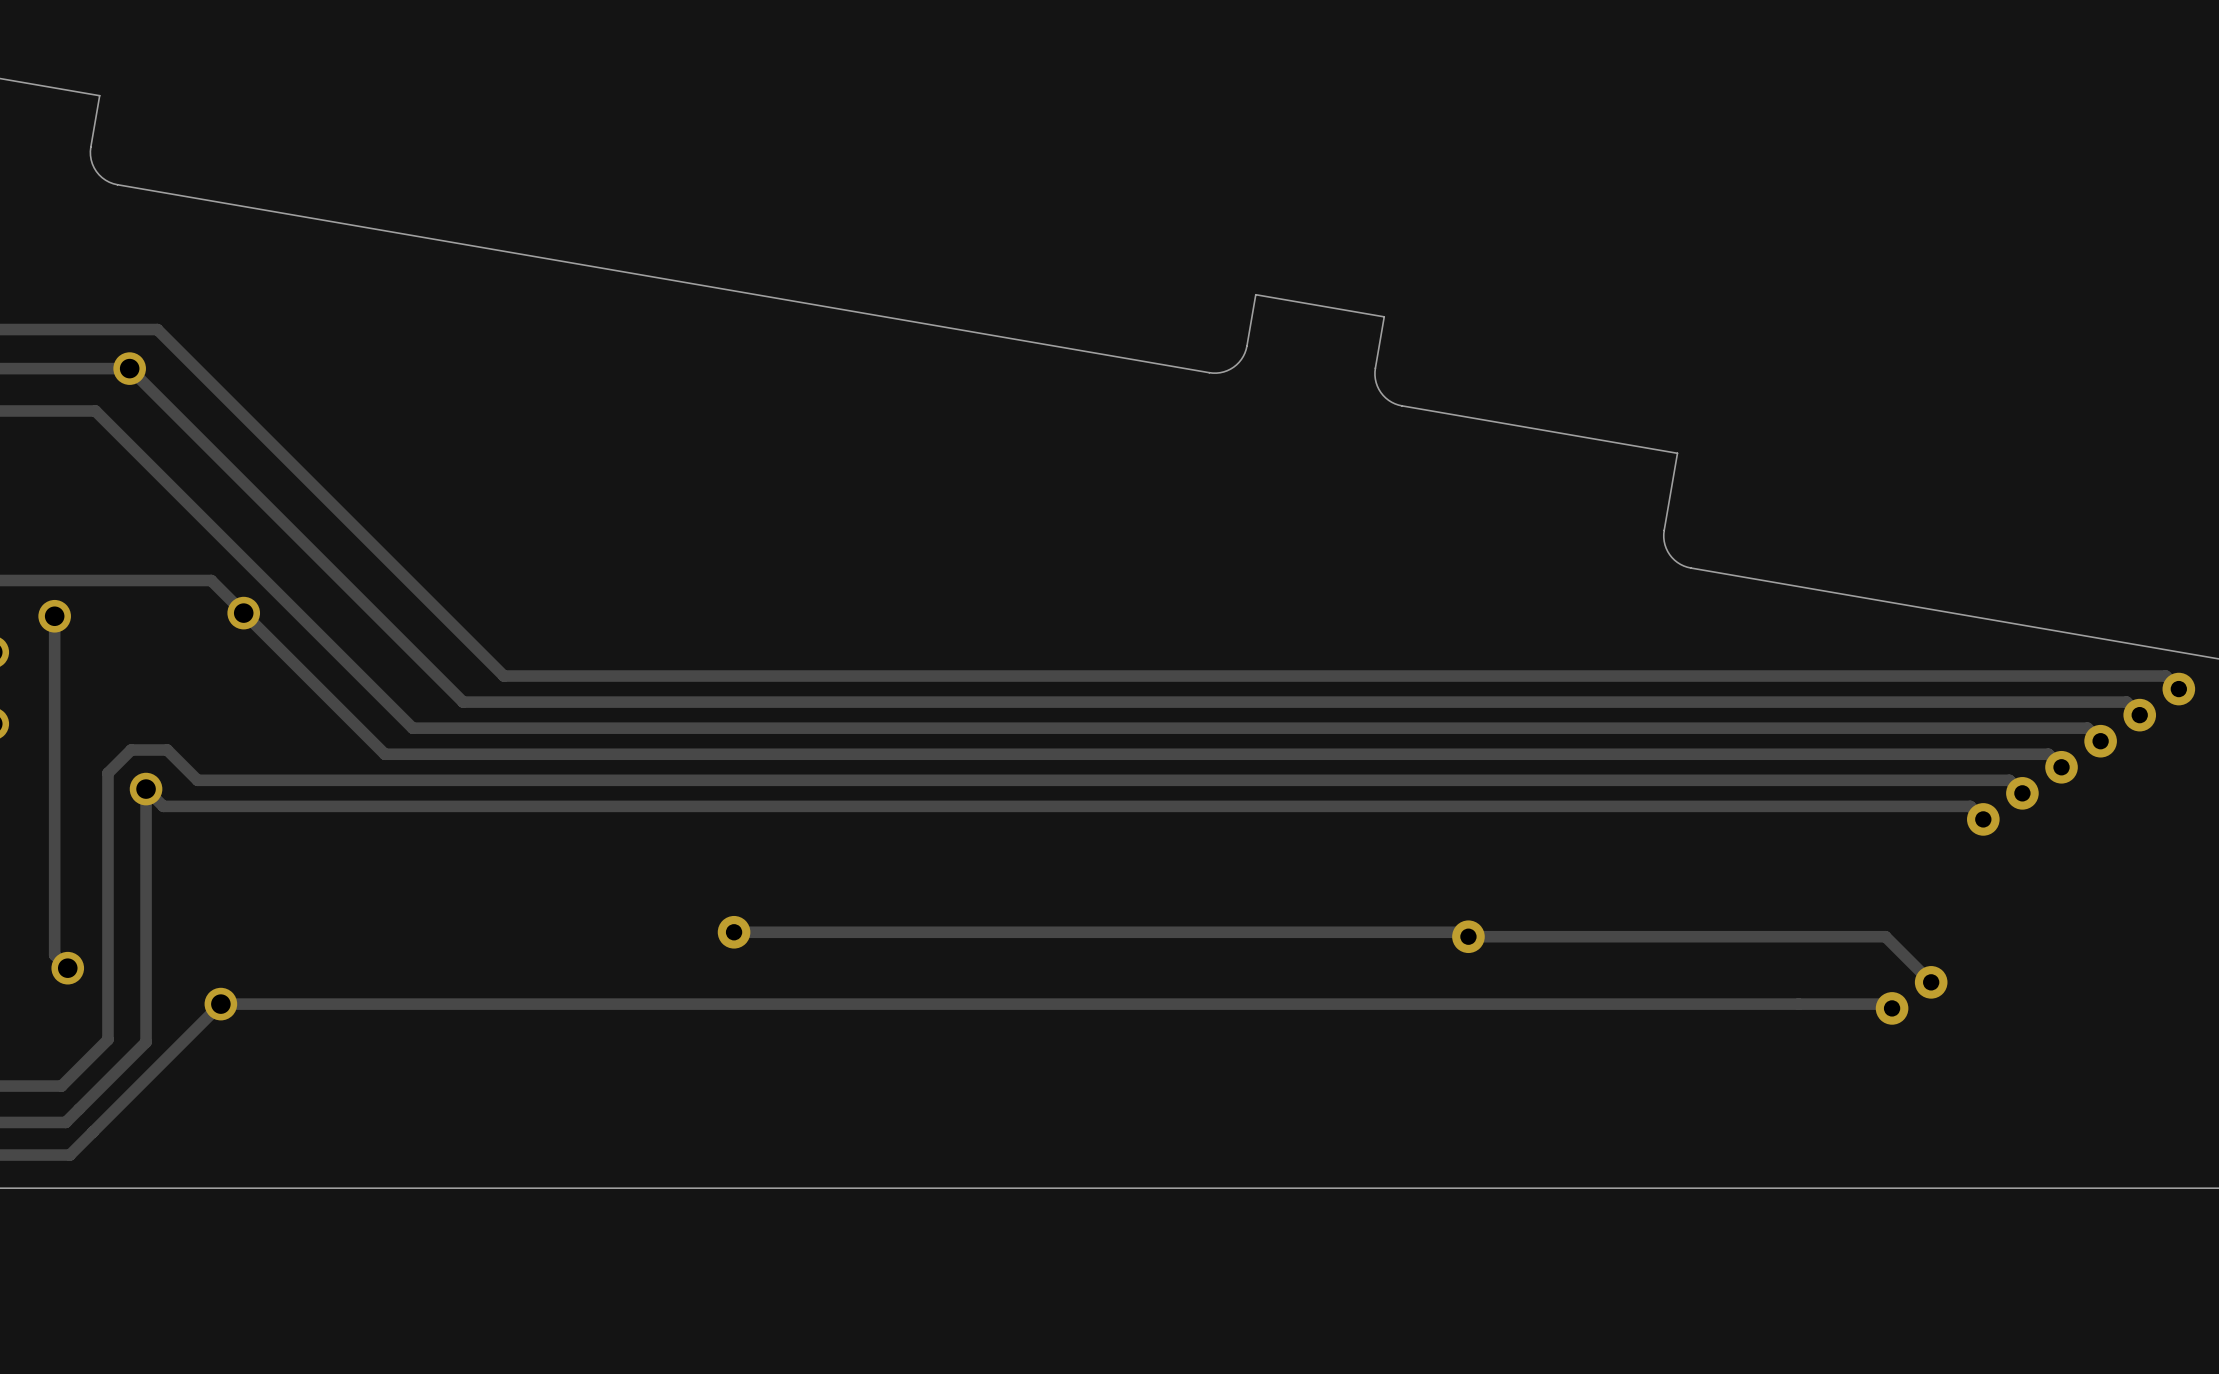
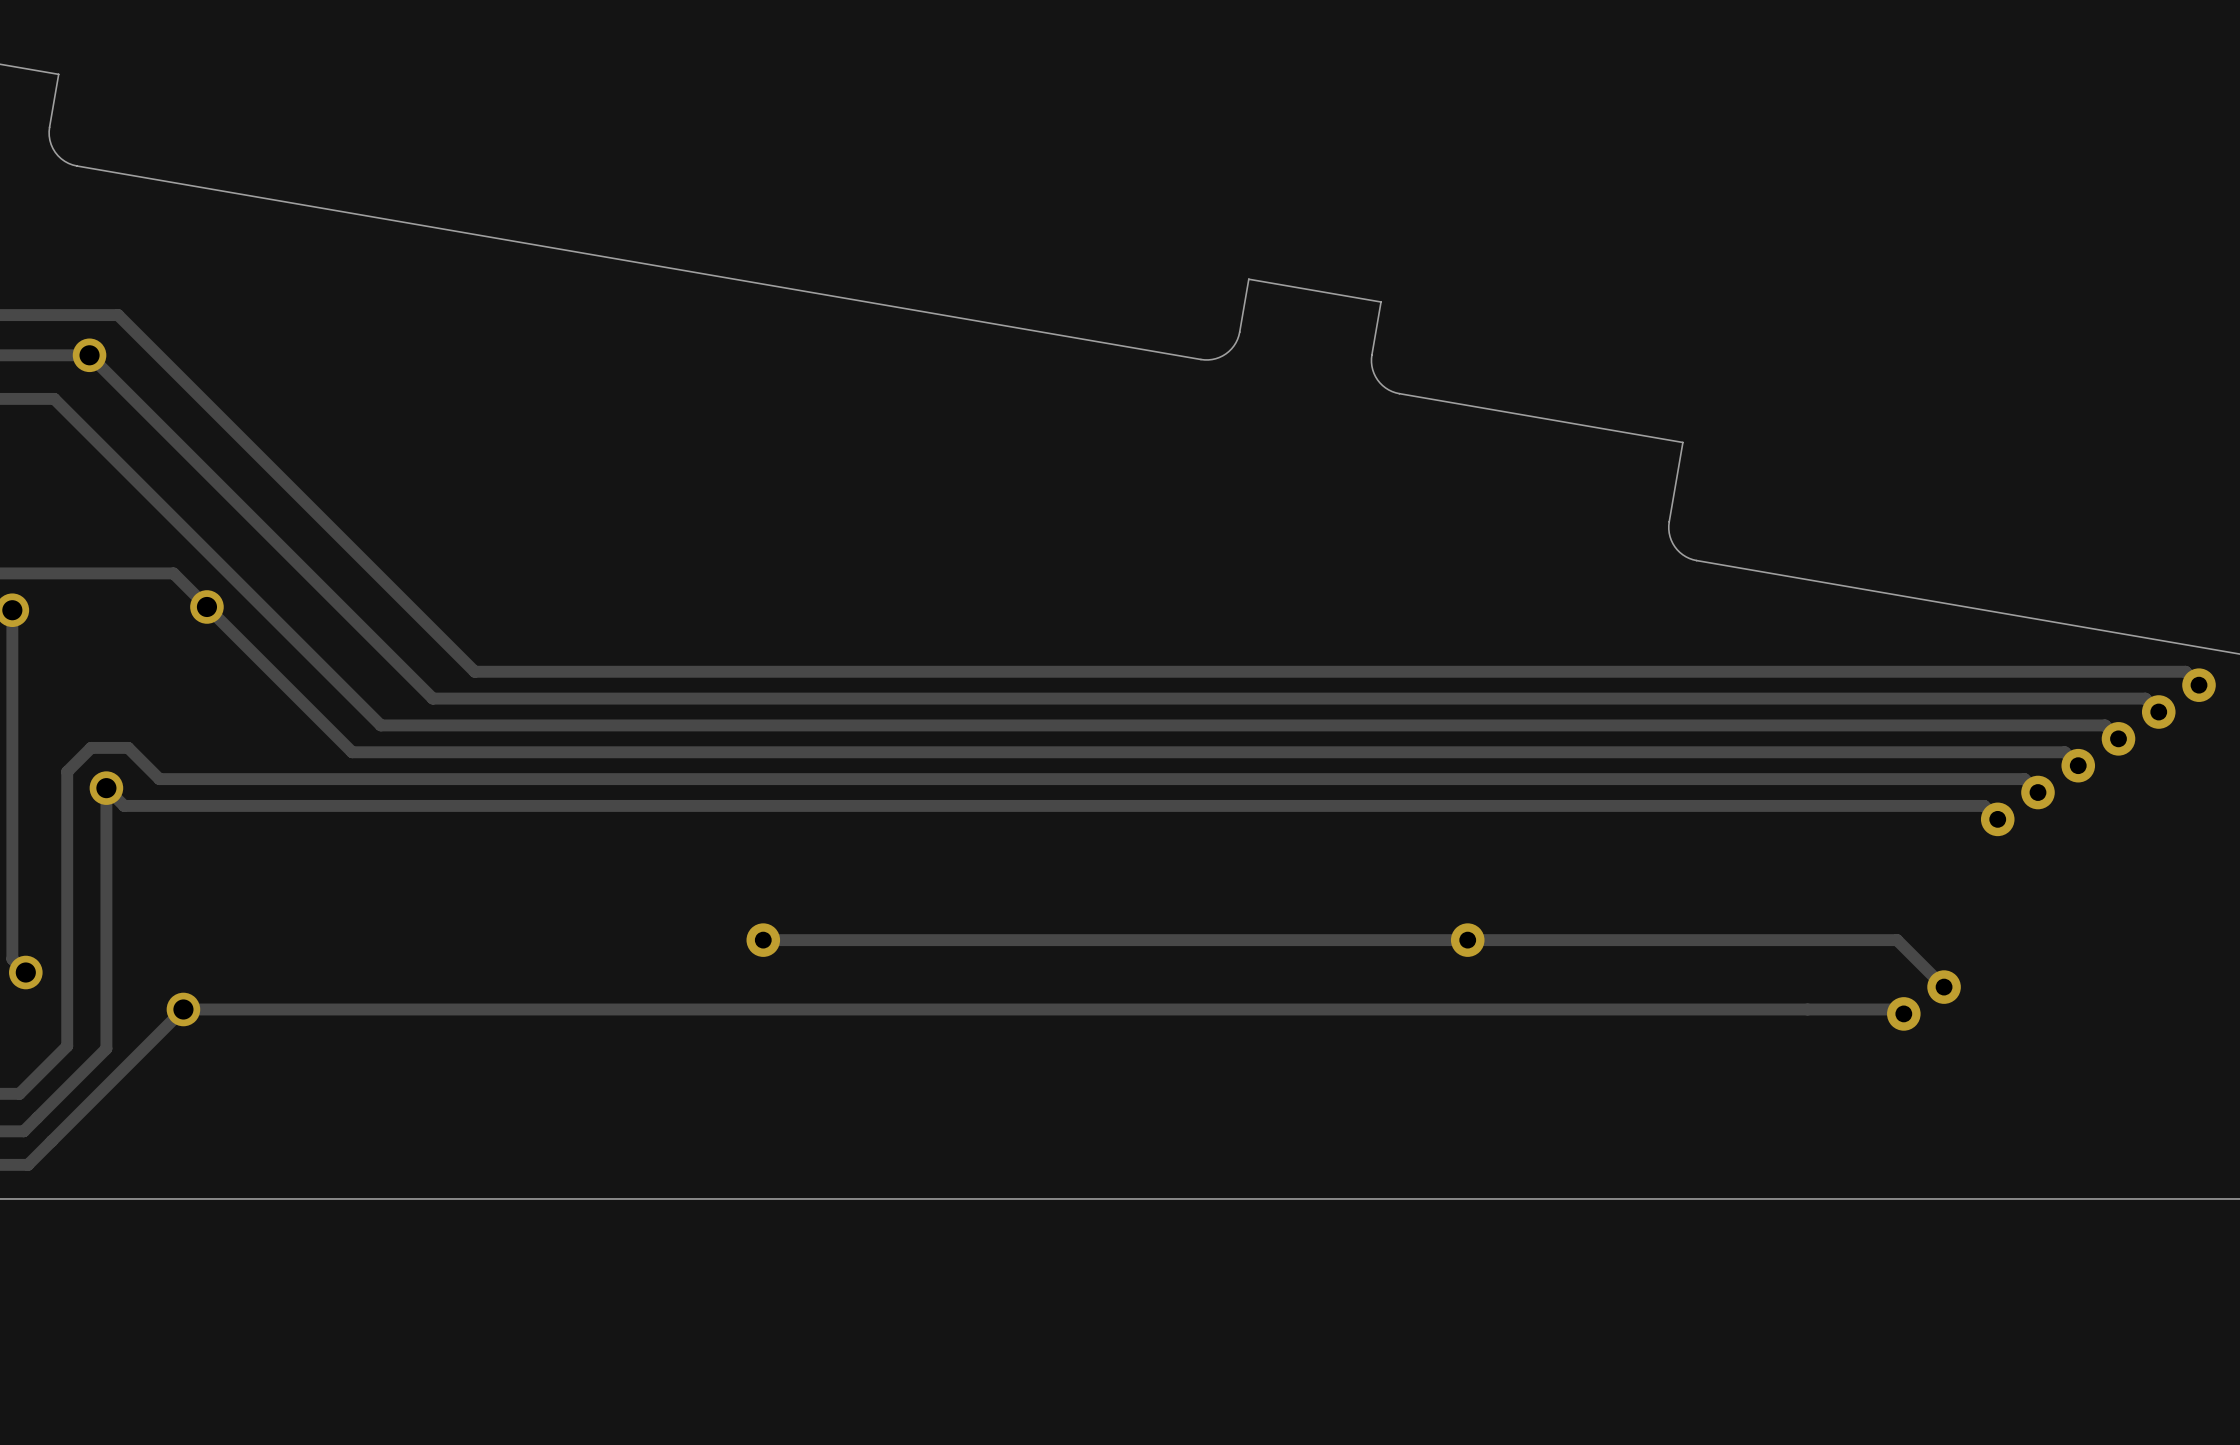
track: (734, 932) (1463, 932) (1468, 936) -> (763, 940) (1467, 940)
via position: (734, 932) -> (763, 940)

